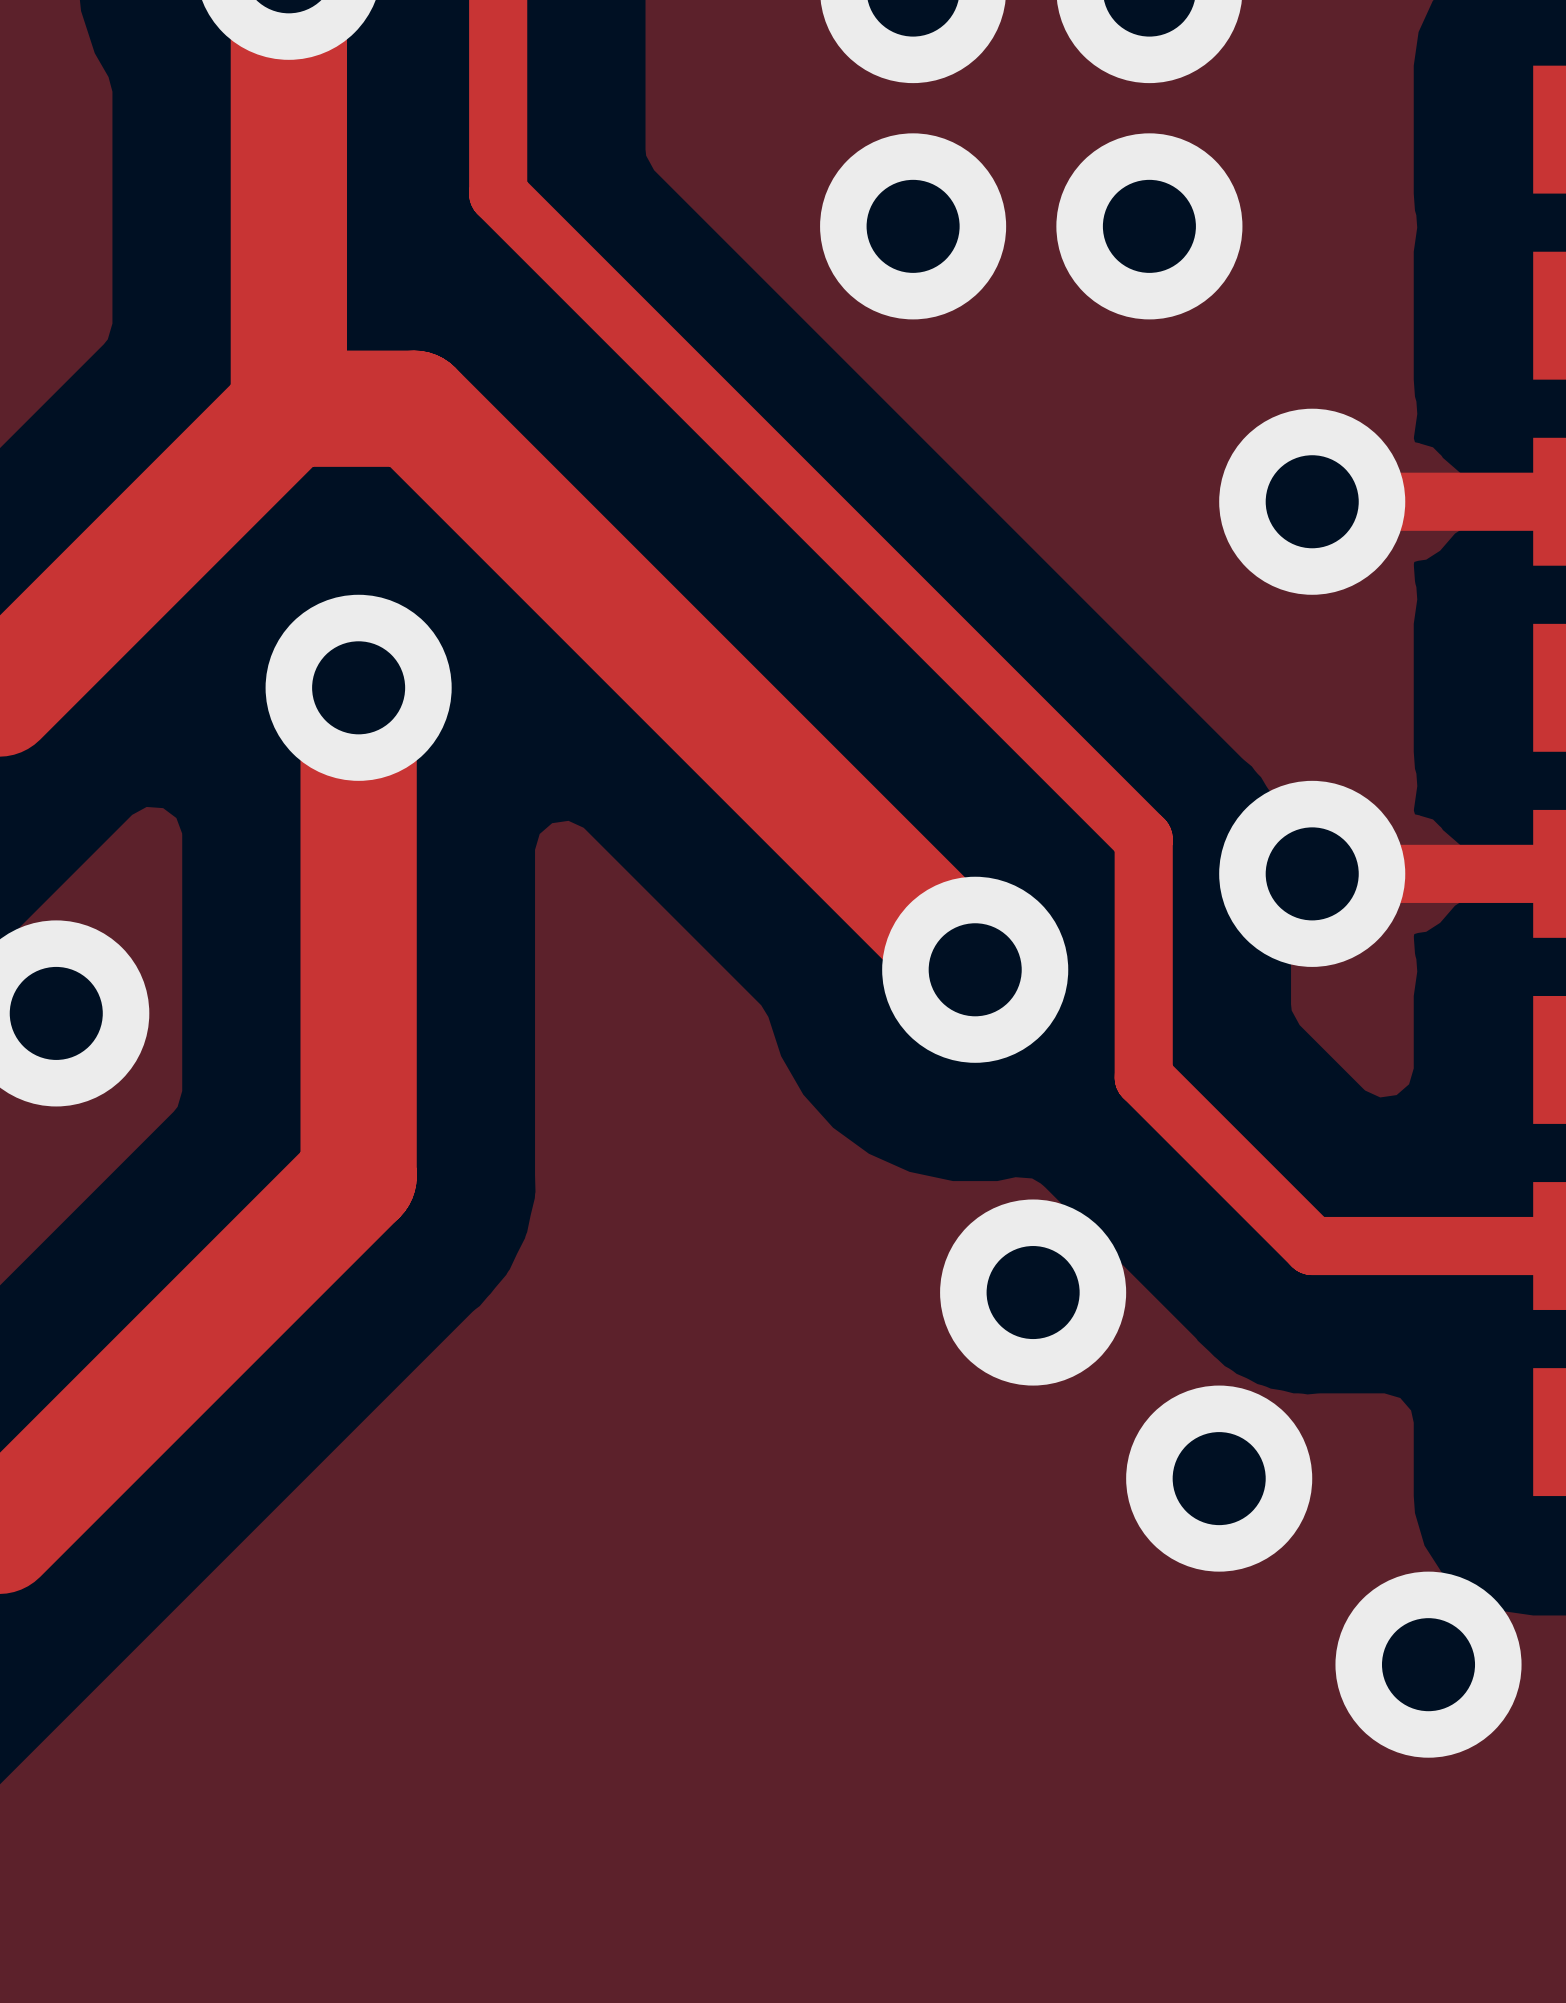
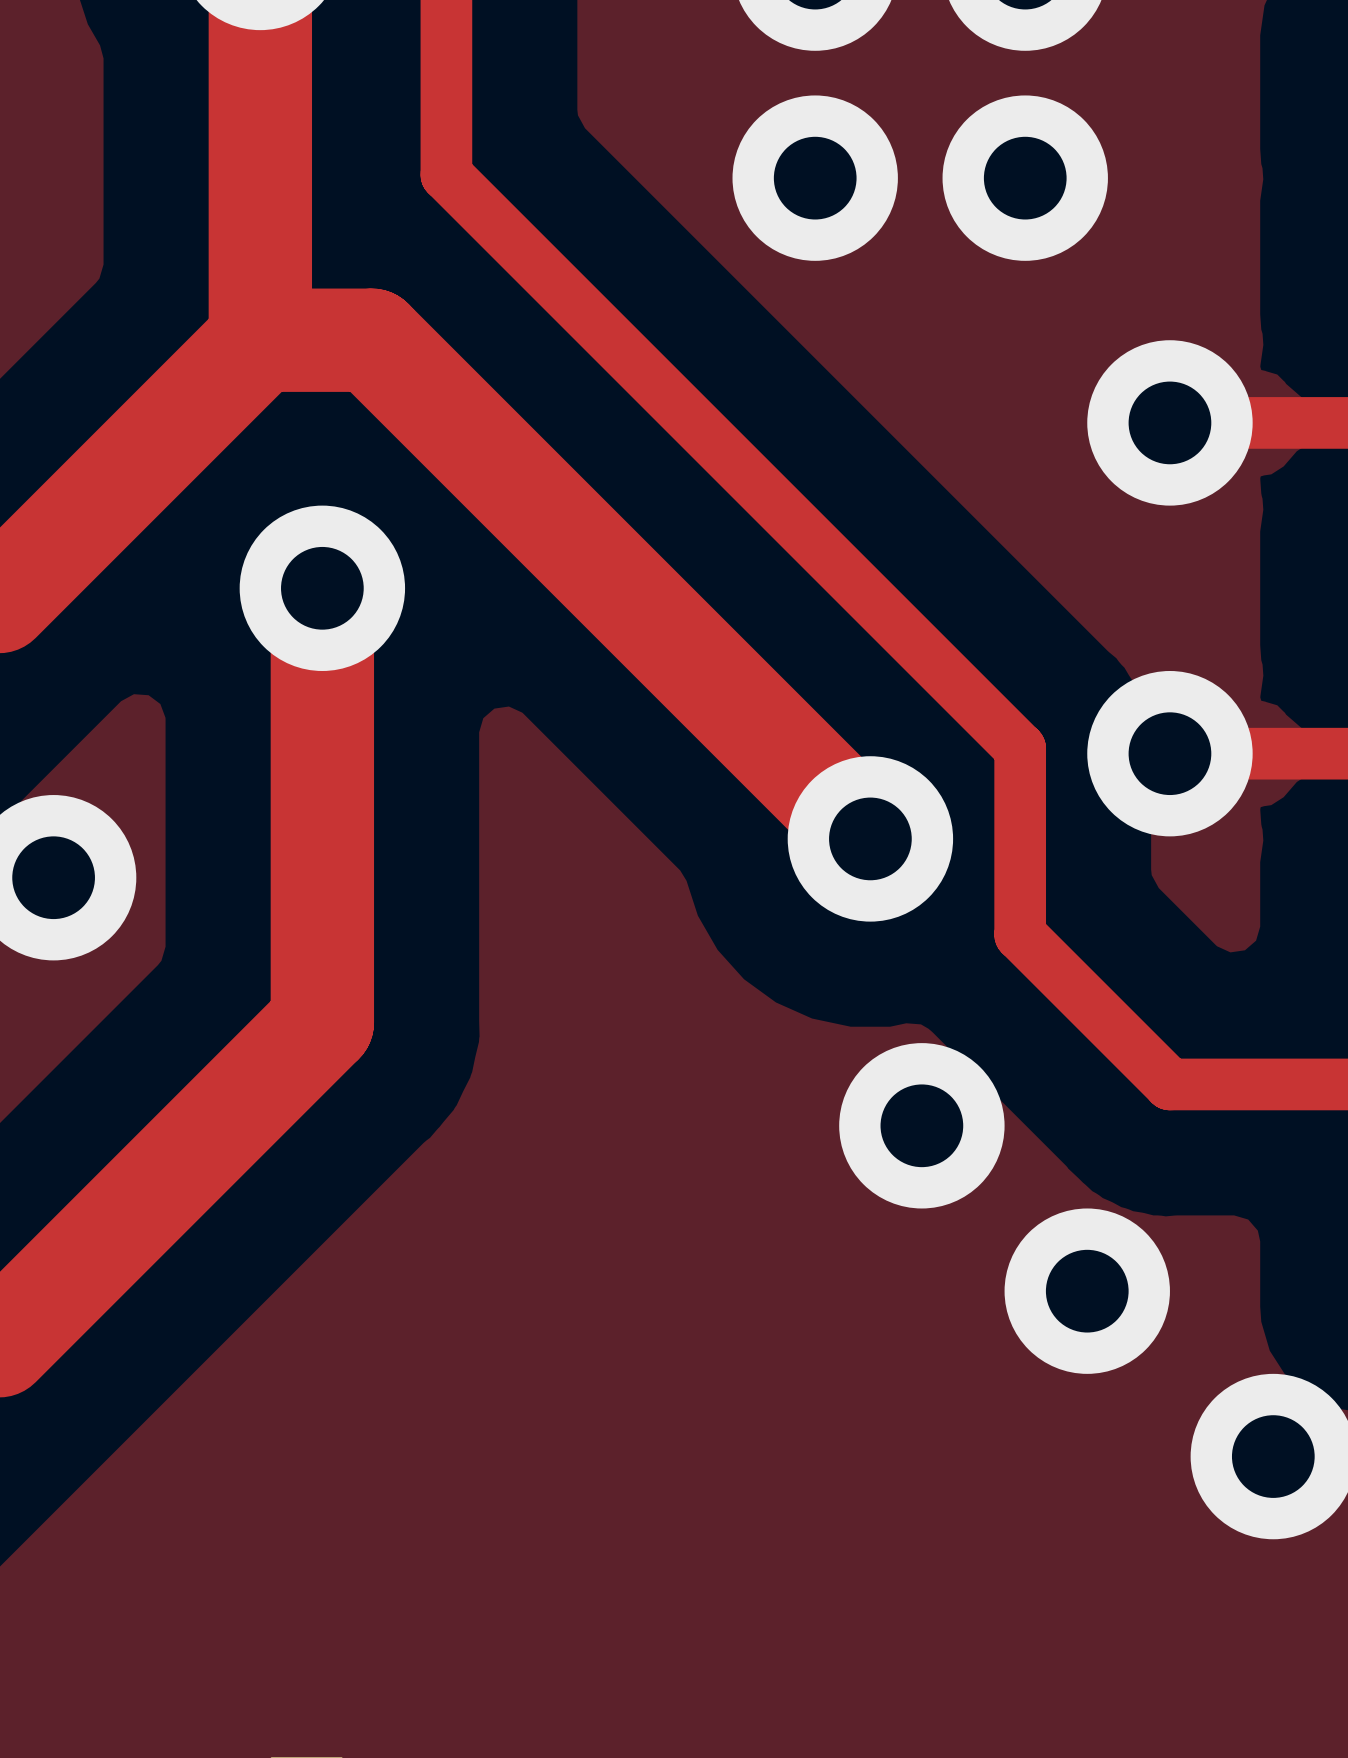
track: (498, 193) (1143, 839) (1143, 868) -> (446, 149) (446, 174) (1020, 748)

